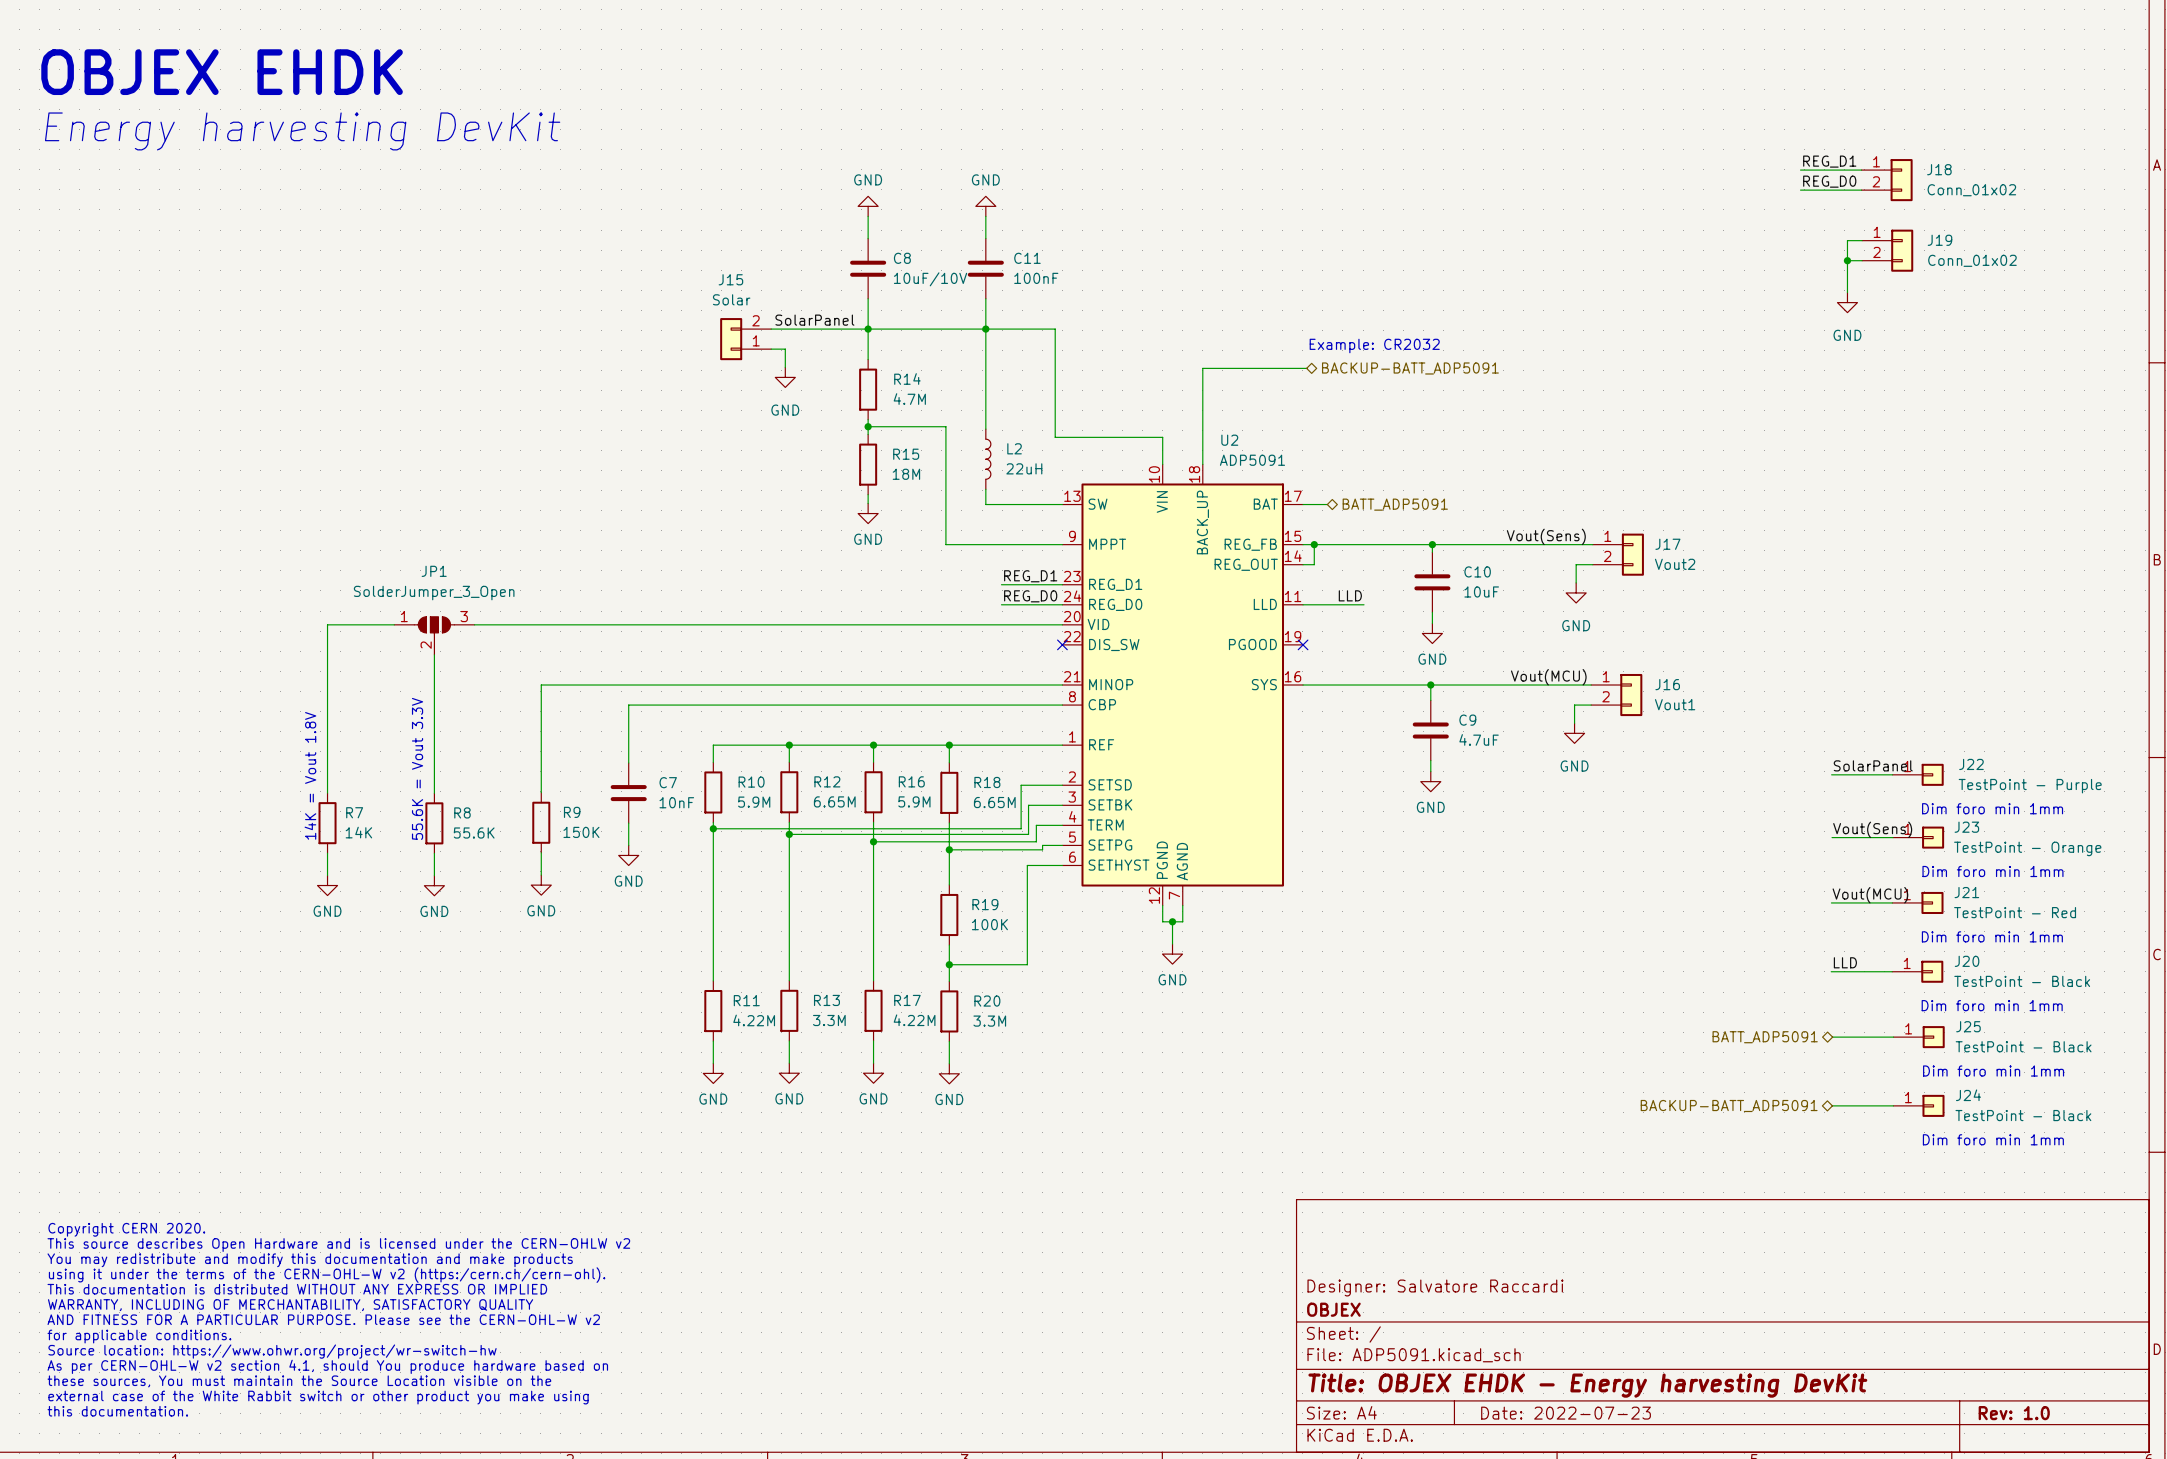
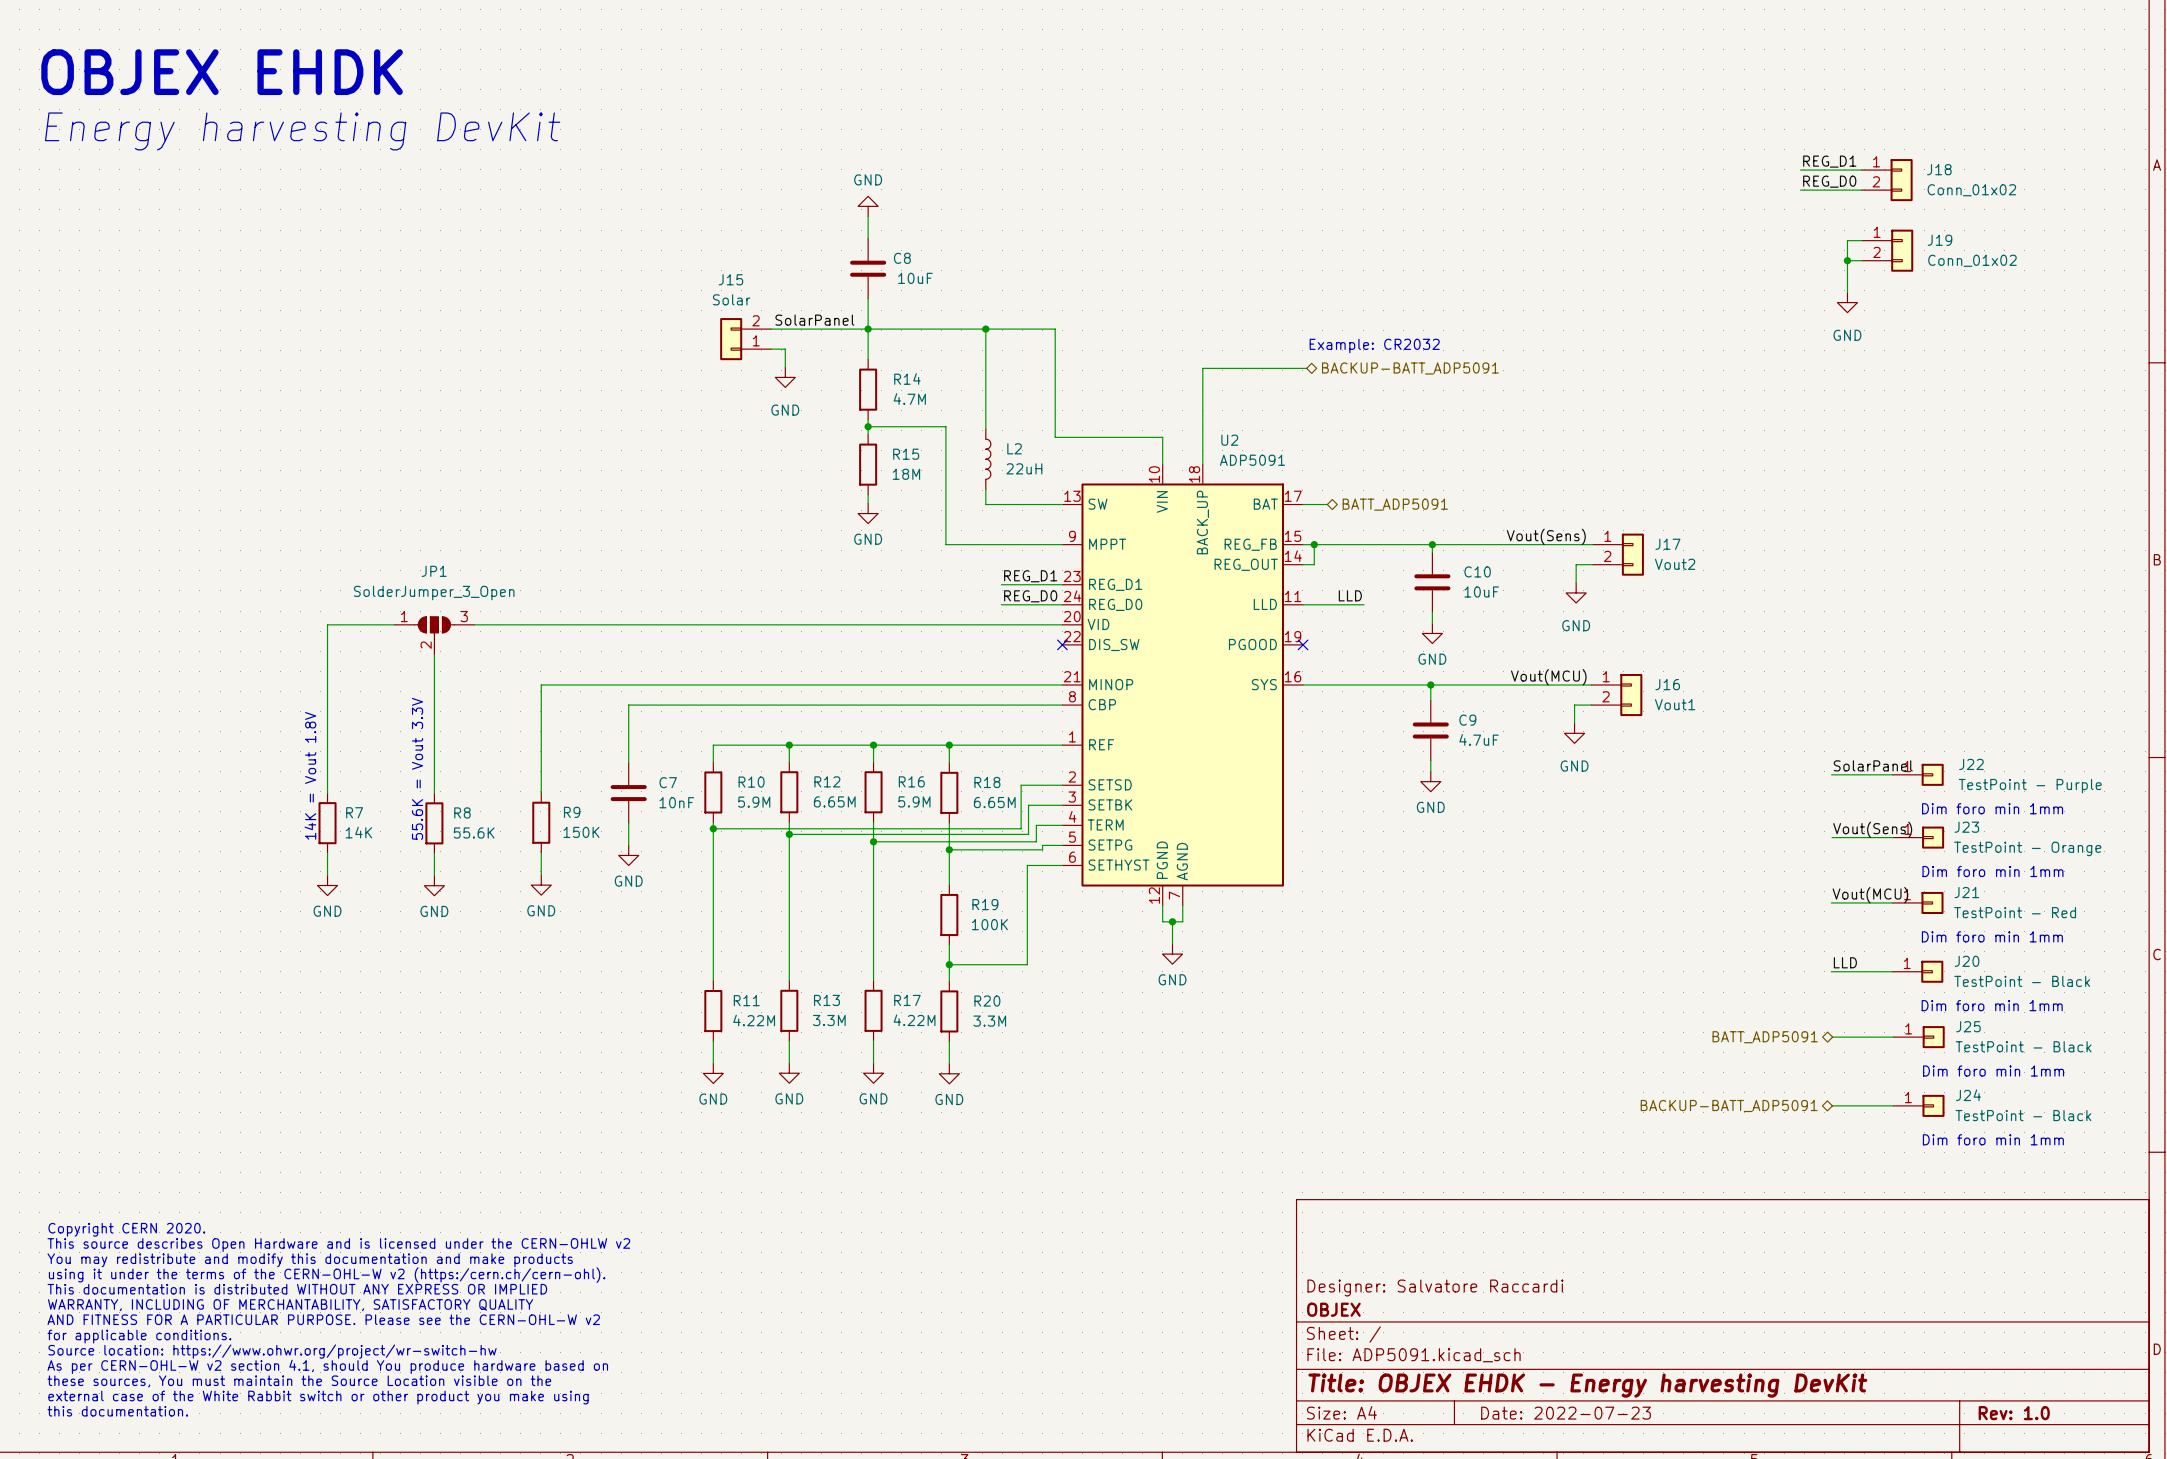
power symbol: GND (985, 206) -> none
wire: (985, 216) (985, 238) -> none
C11: 100nF (985, 268) -> none
C8 value: 10uF/10V (930, 279) -> 10uF (915, 278)
wire: (985, 298) (985, 329) -> none

